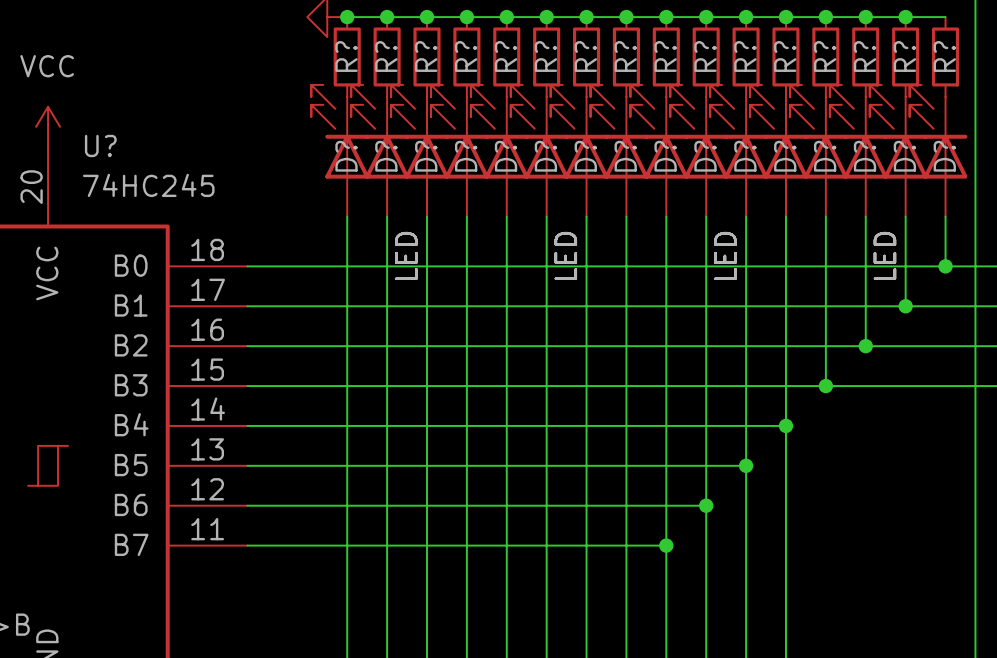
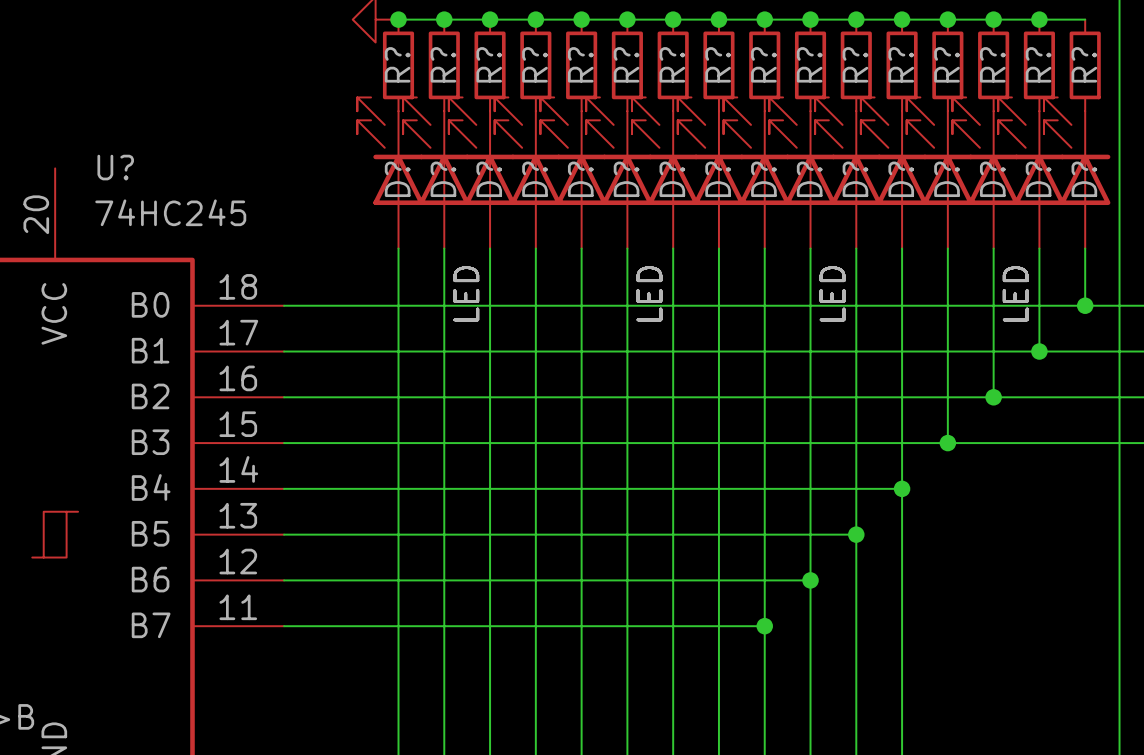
power symbol: VCC (48, 126) -> none

